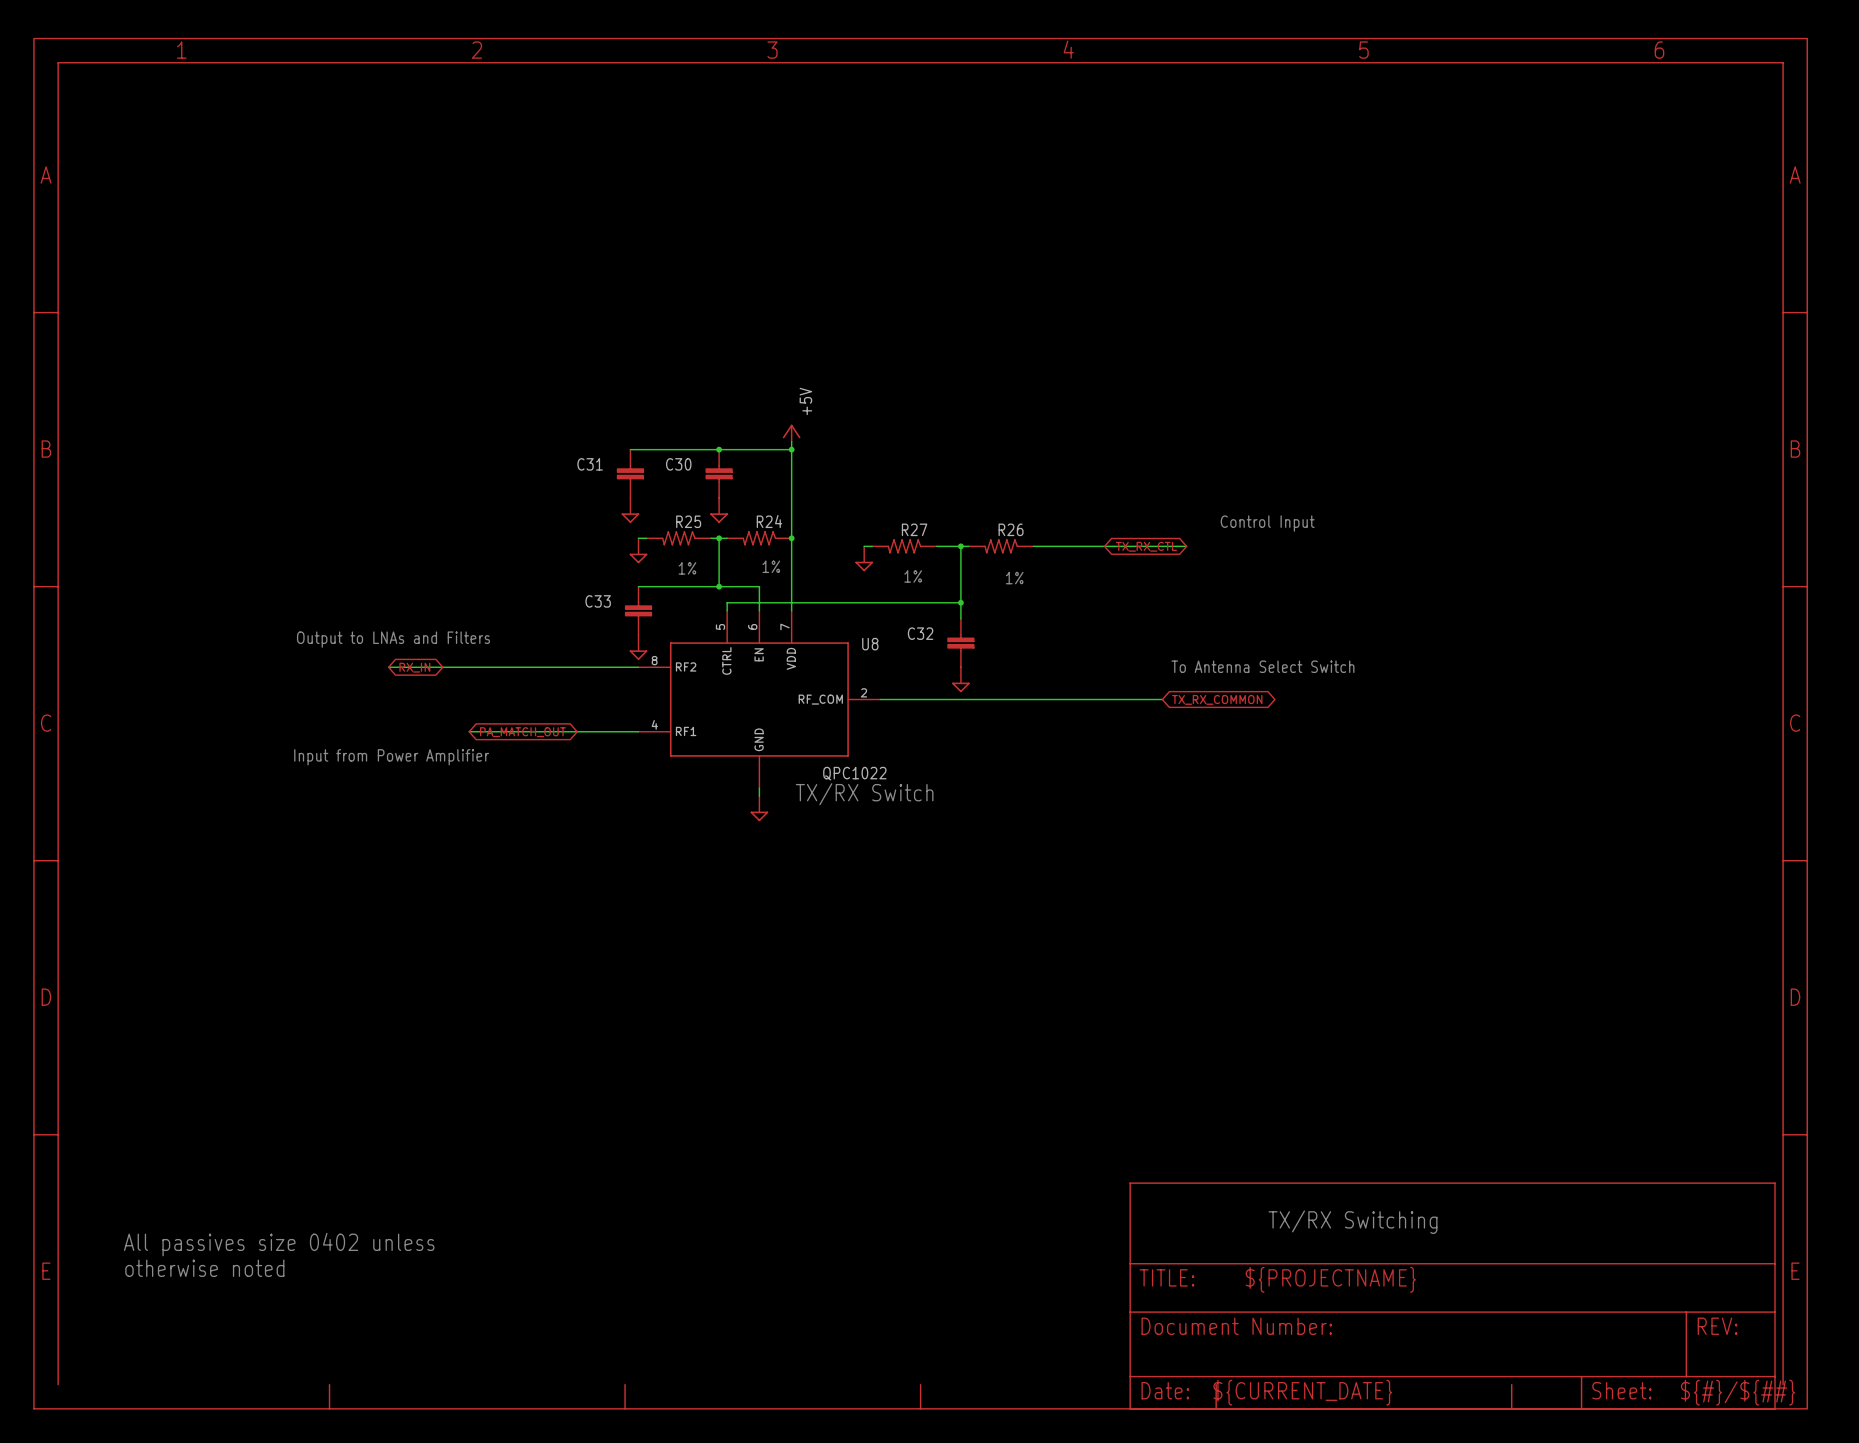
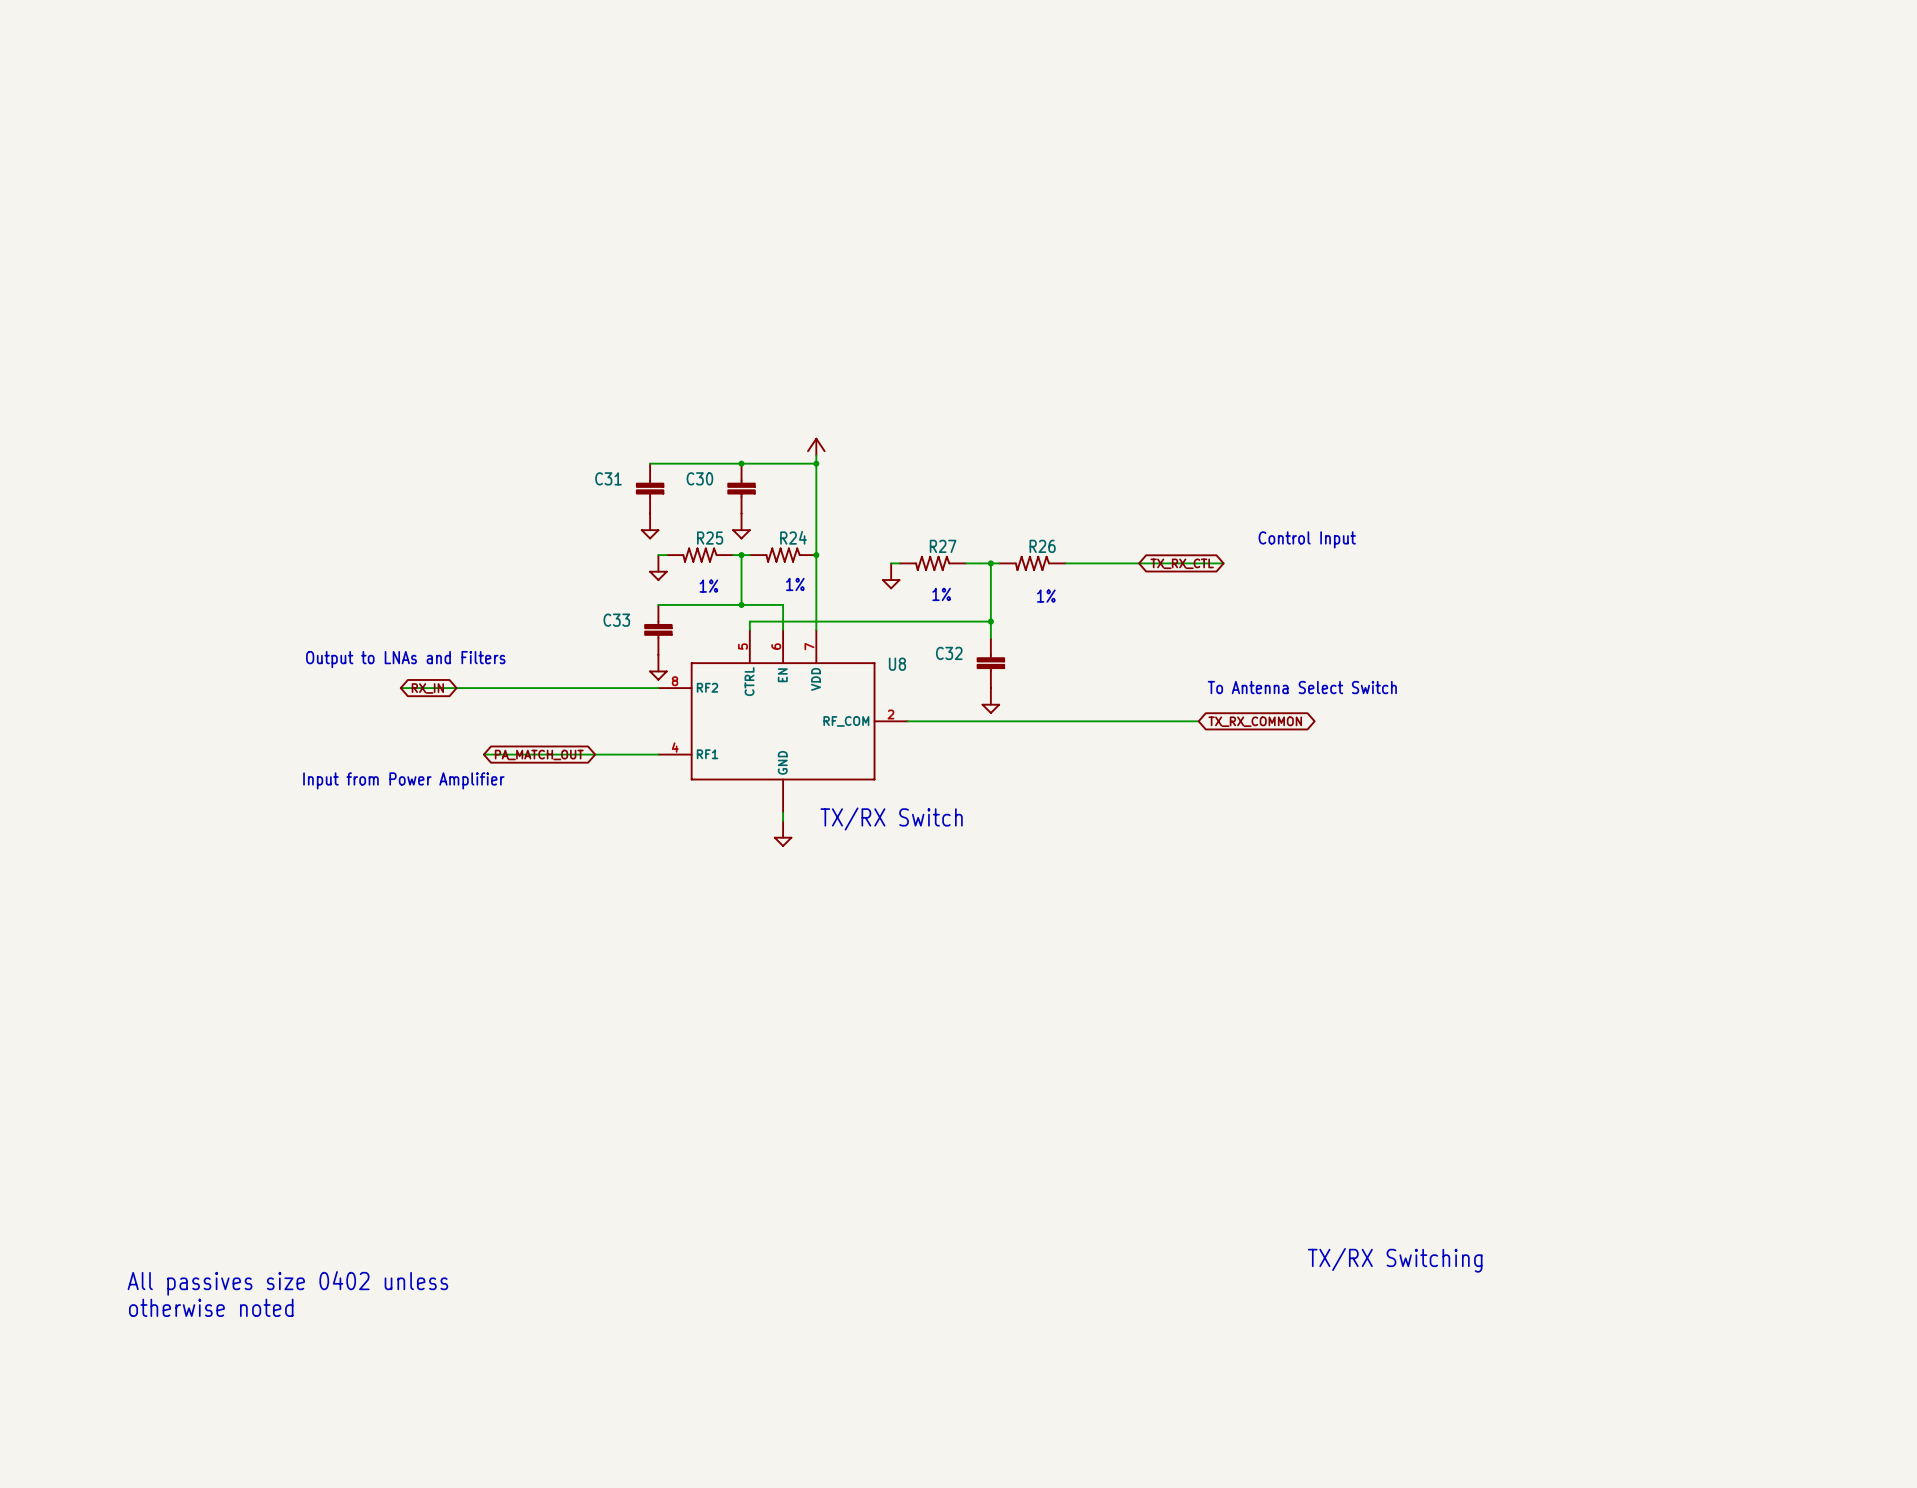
power symbol text: +5V (805, 401) -> none
power symbol: (920, 723) -> none
U8 value: QPC1022 (854, 773) -> none
power symbol: (1452, 1295) -> none

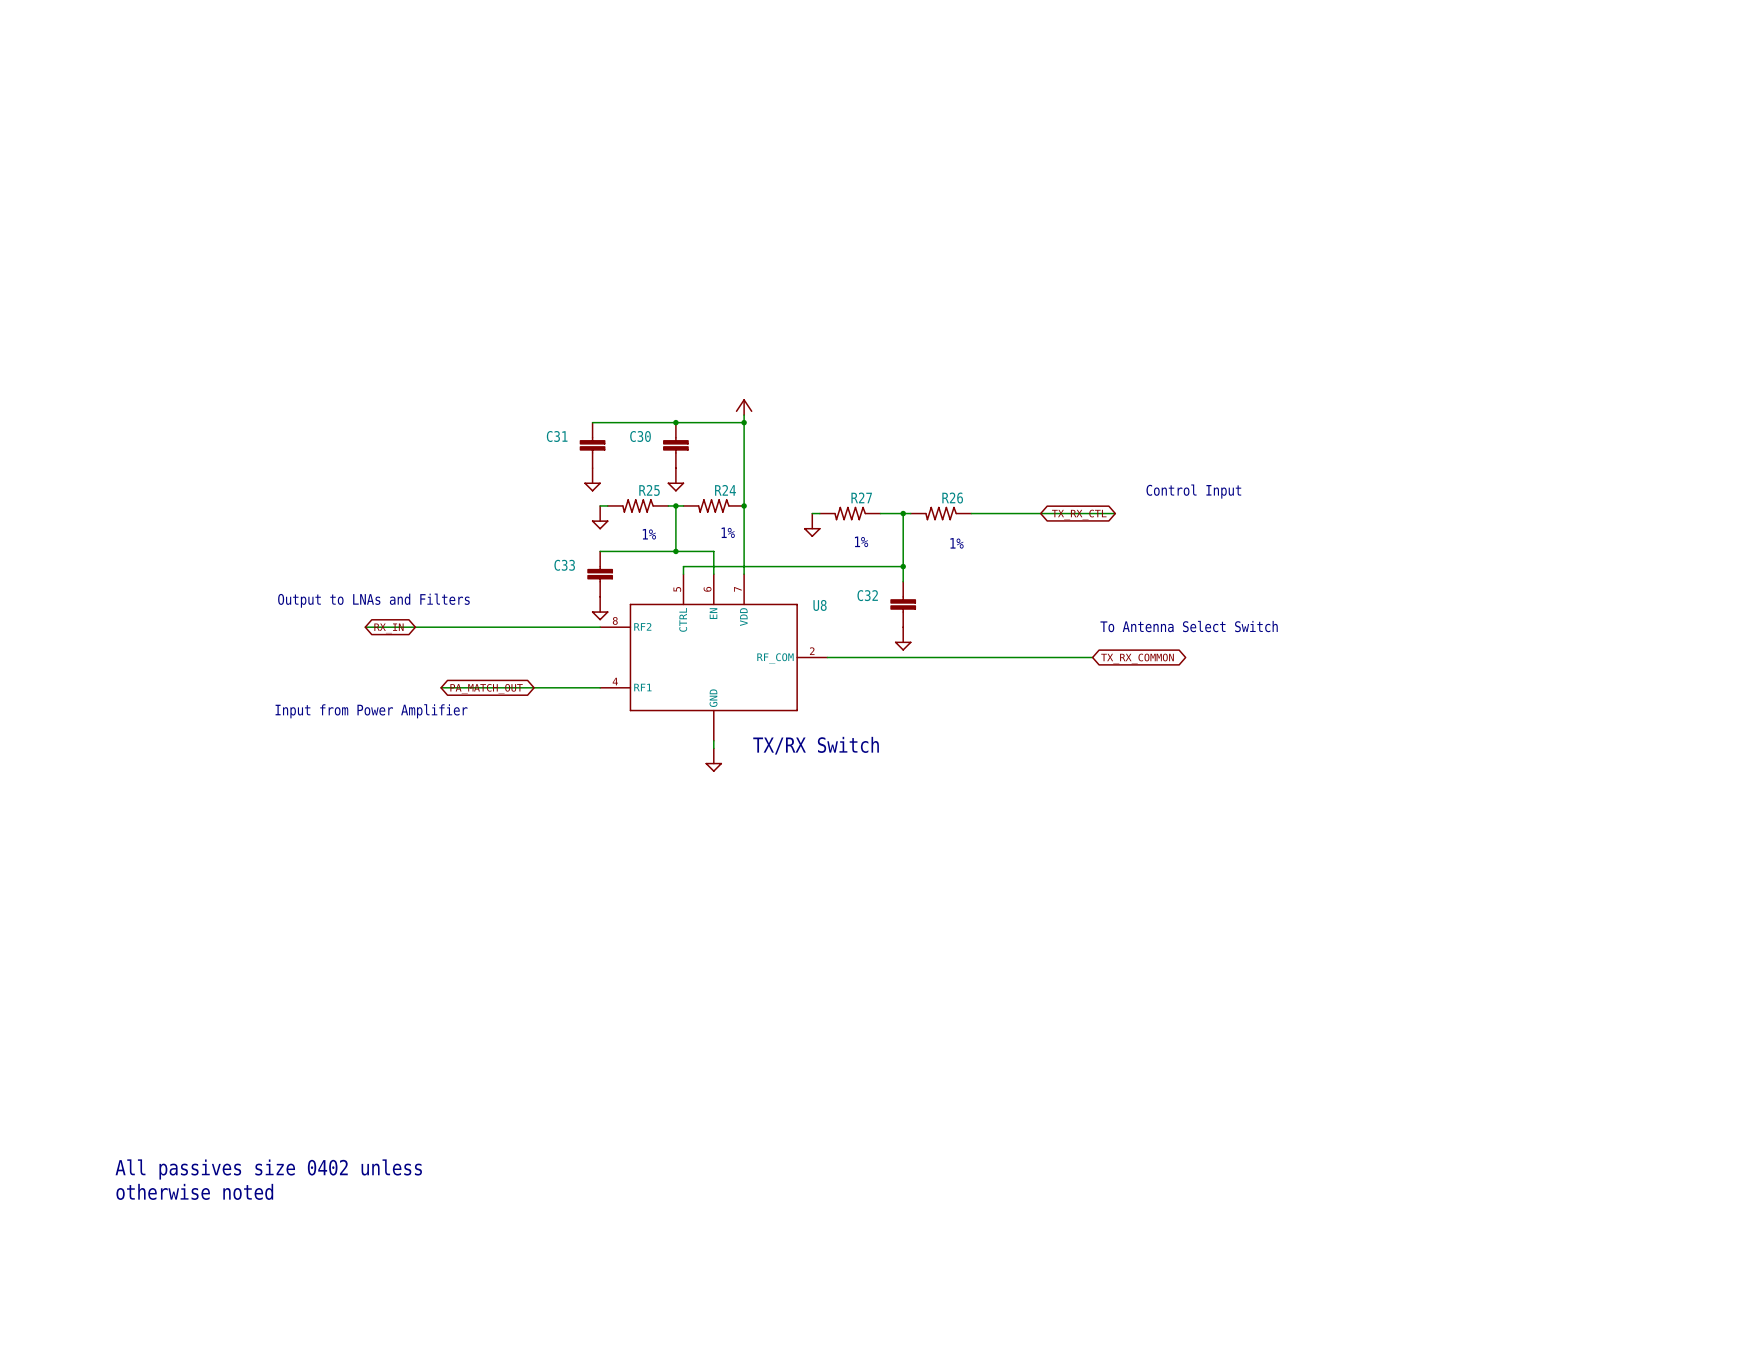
text: TX/RX Switching (1395, 1260) -> none

